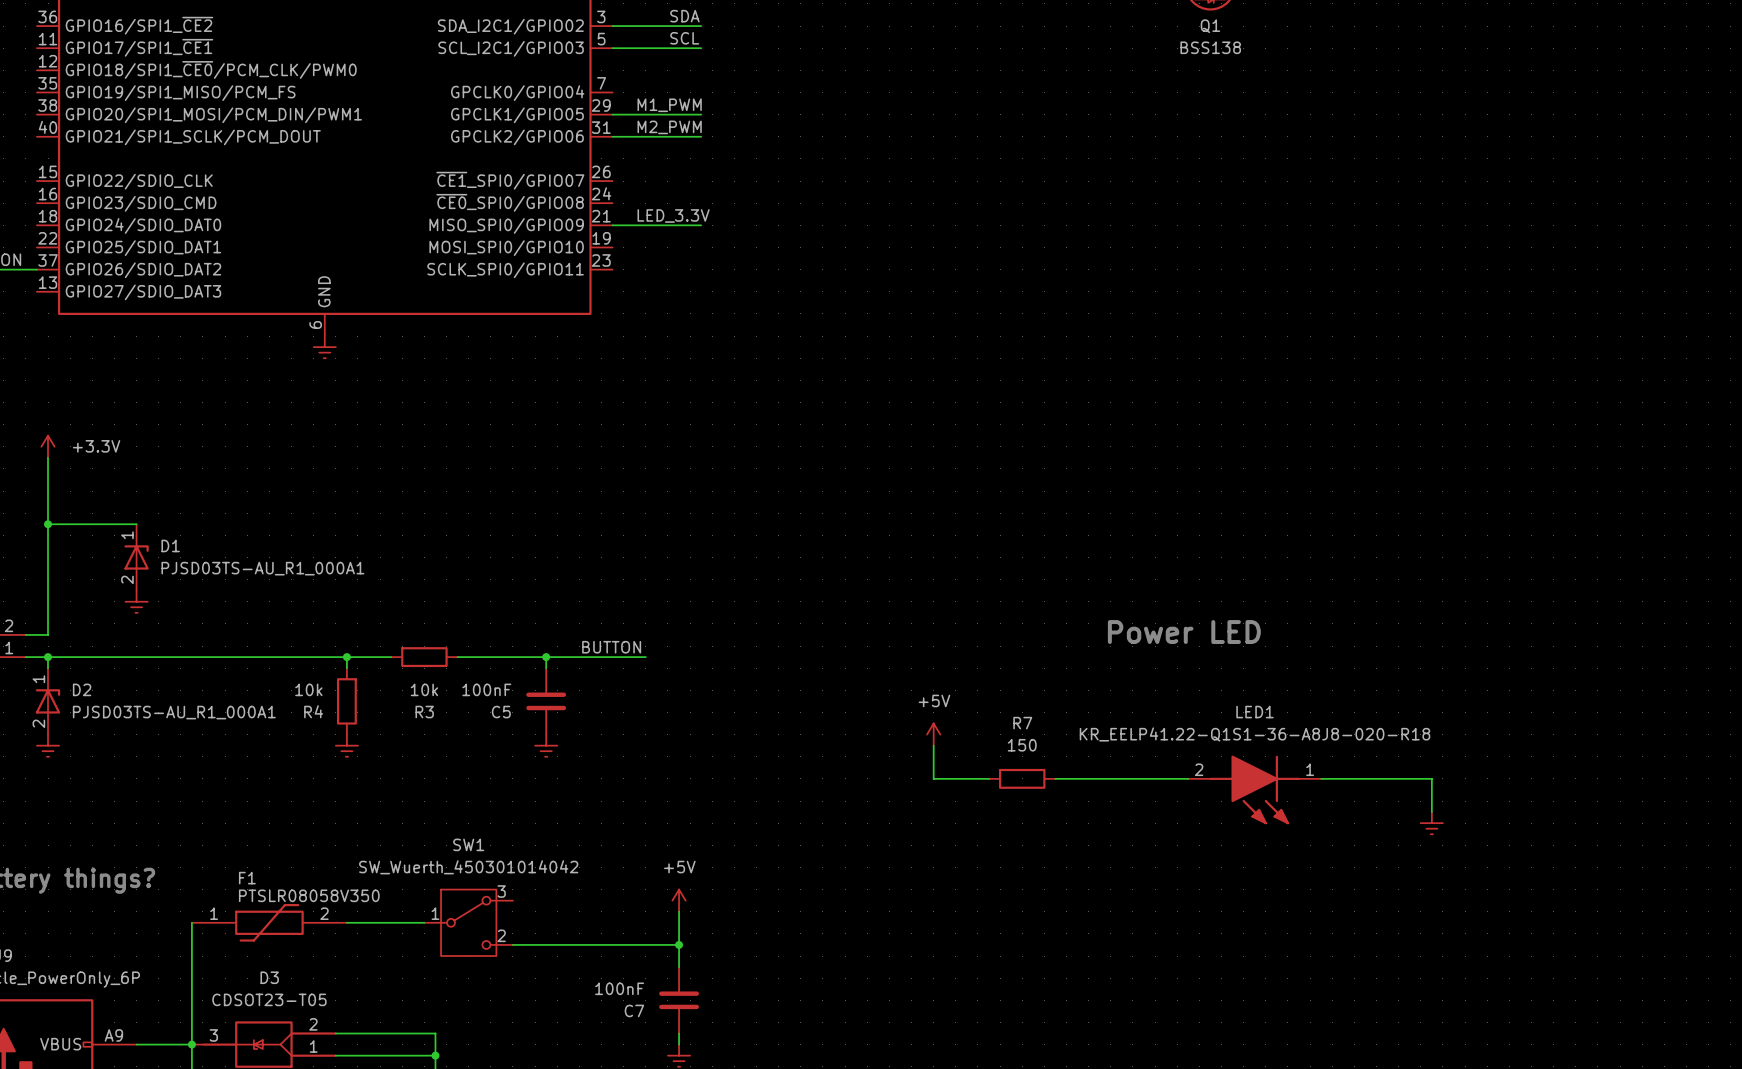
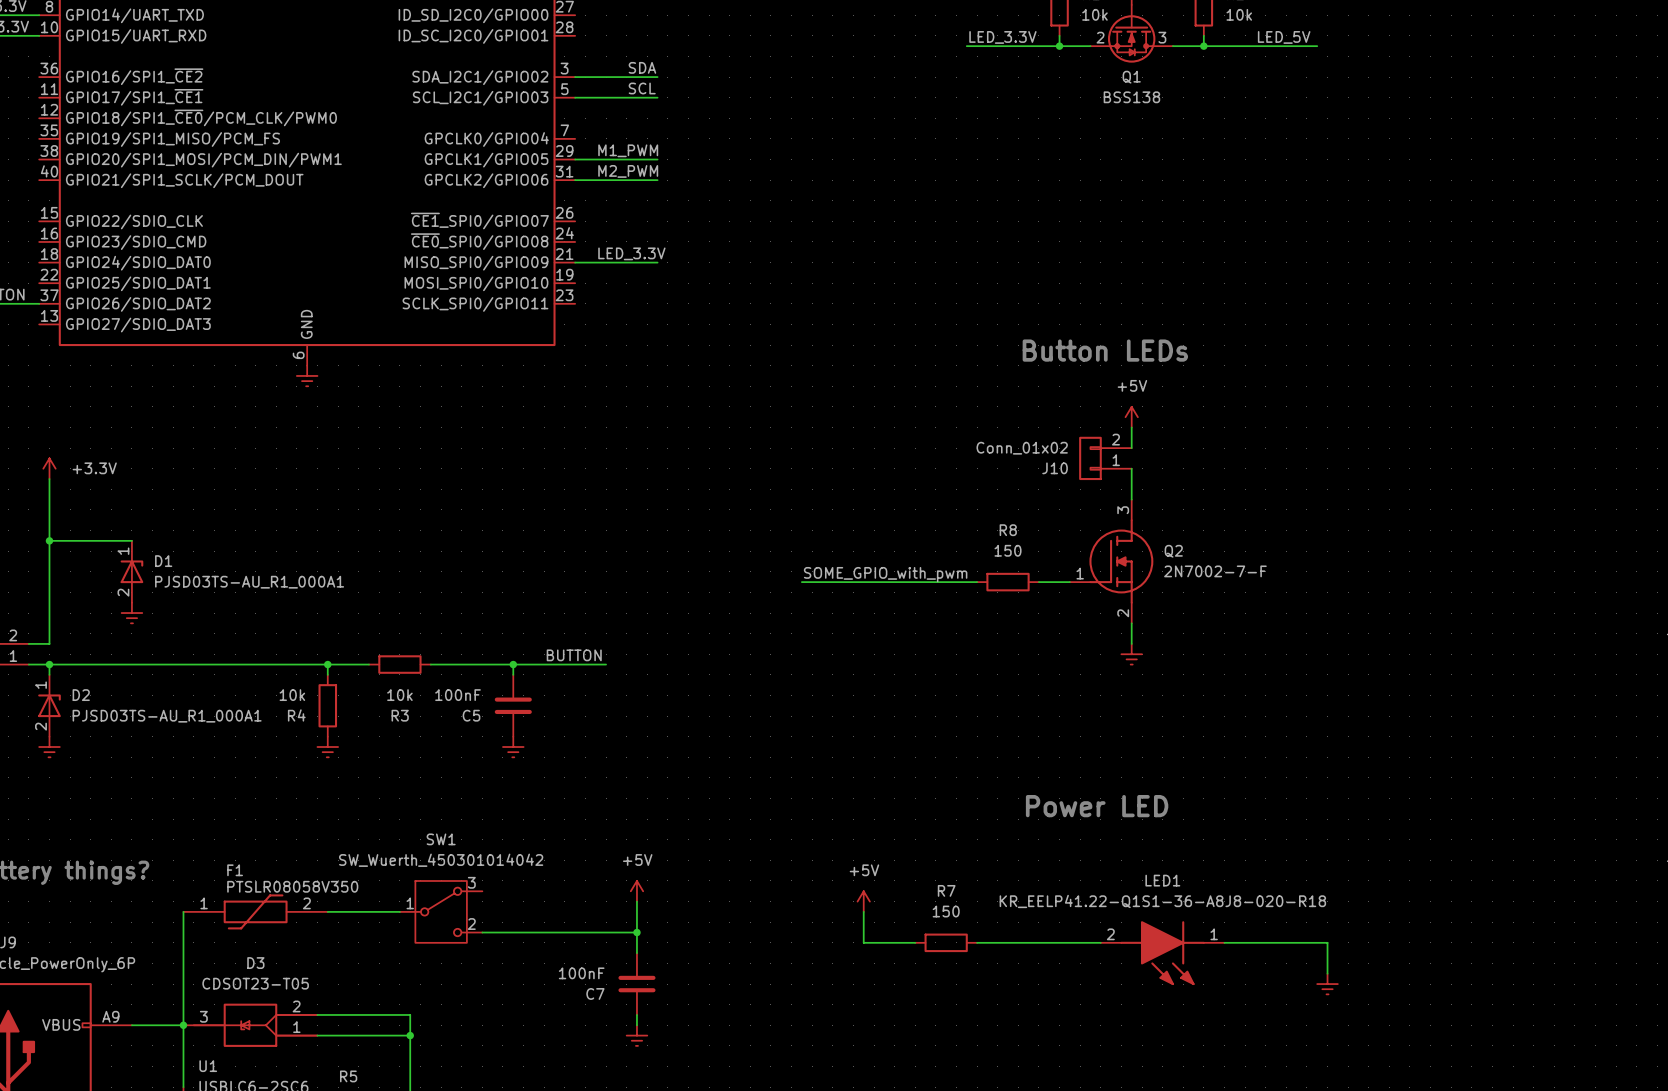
text: none -> Button LEDs (1105, 350)
power symbol: none -> +5V (1131, 417)
wire: none -> (1131, 427) (1131, 448)
J10: none -> Conn_01x02 (1105, 458)
wire: none -> (1131, 468) (1131, 499)
Q2: none -> 2N7002-7-F (1111, 561)
label: none -> SOME_GPIO_with_pwm (885, 574)
wire: none -> (801, 582) (977, 582)
R8: none -> 150 (1008, 582)
wire: none -> (1038, 582) (1069, 582)
wire: none -> (1131, 623) (1131, 643)
text position: Power LED (1184, 632) -> Power LED (1097, 806)
power symbol: none -> (1131, 654)
power symbol position: +5V (933, 734) -> +5V (863, 901)
wire: (933, 745) (933, 778) (989, 778) -> (863, 911) (863, 942) (915, 942)
R7 position: (1022, 778) -> (946, 942)
wire: (1055, 778) (1188, 778) -> (977, 942) (1100, 942)
wire: (1321, 778) (1431, 778) (1431, 812) -> (1224, 942) (1327, 942) (1327, 973)
LED1 position: (1254, 789) -> (1162, 953)
power symbol: (1431, 823) -> none
power symbol: none -> (1327, 984)

